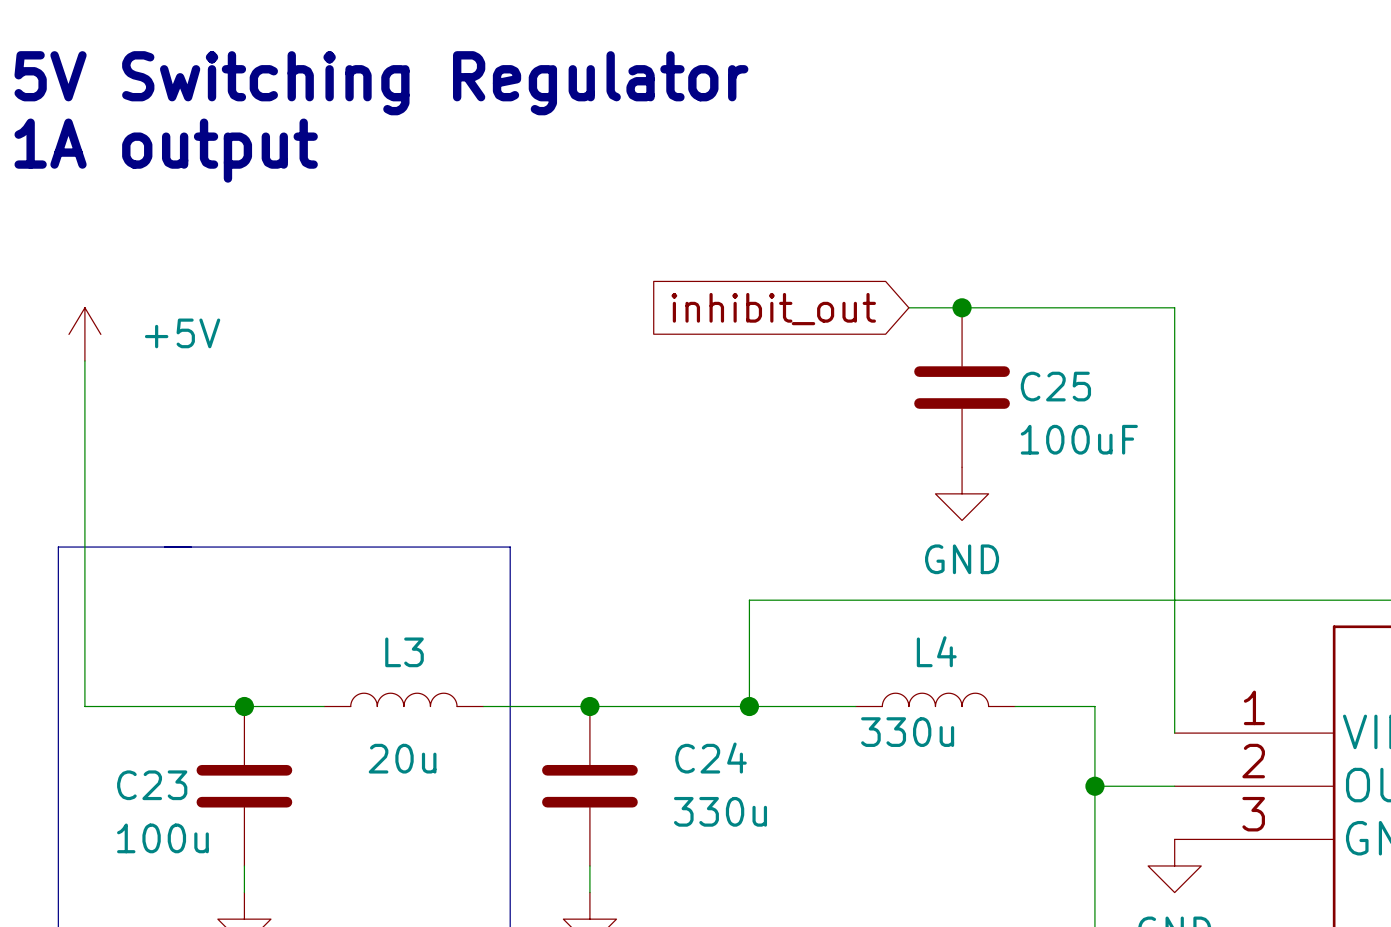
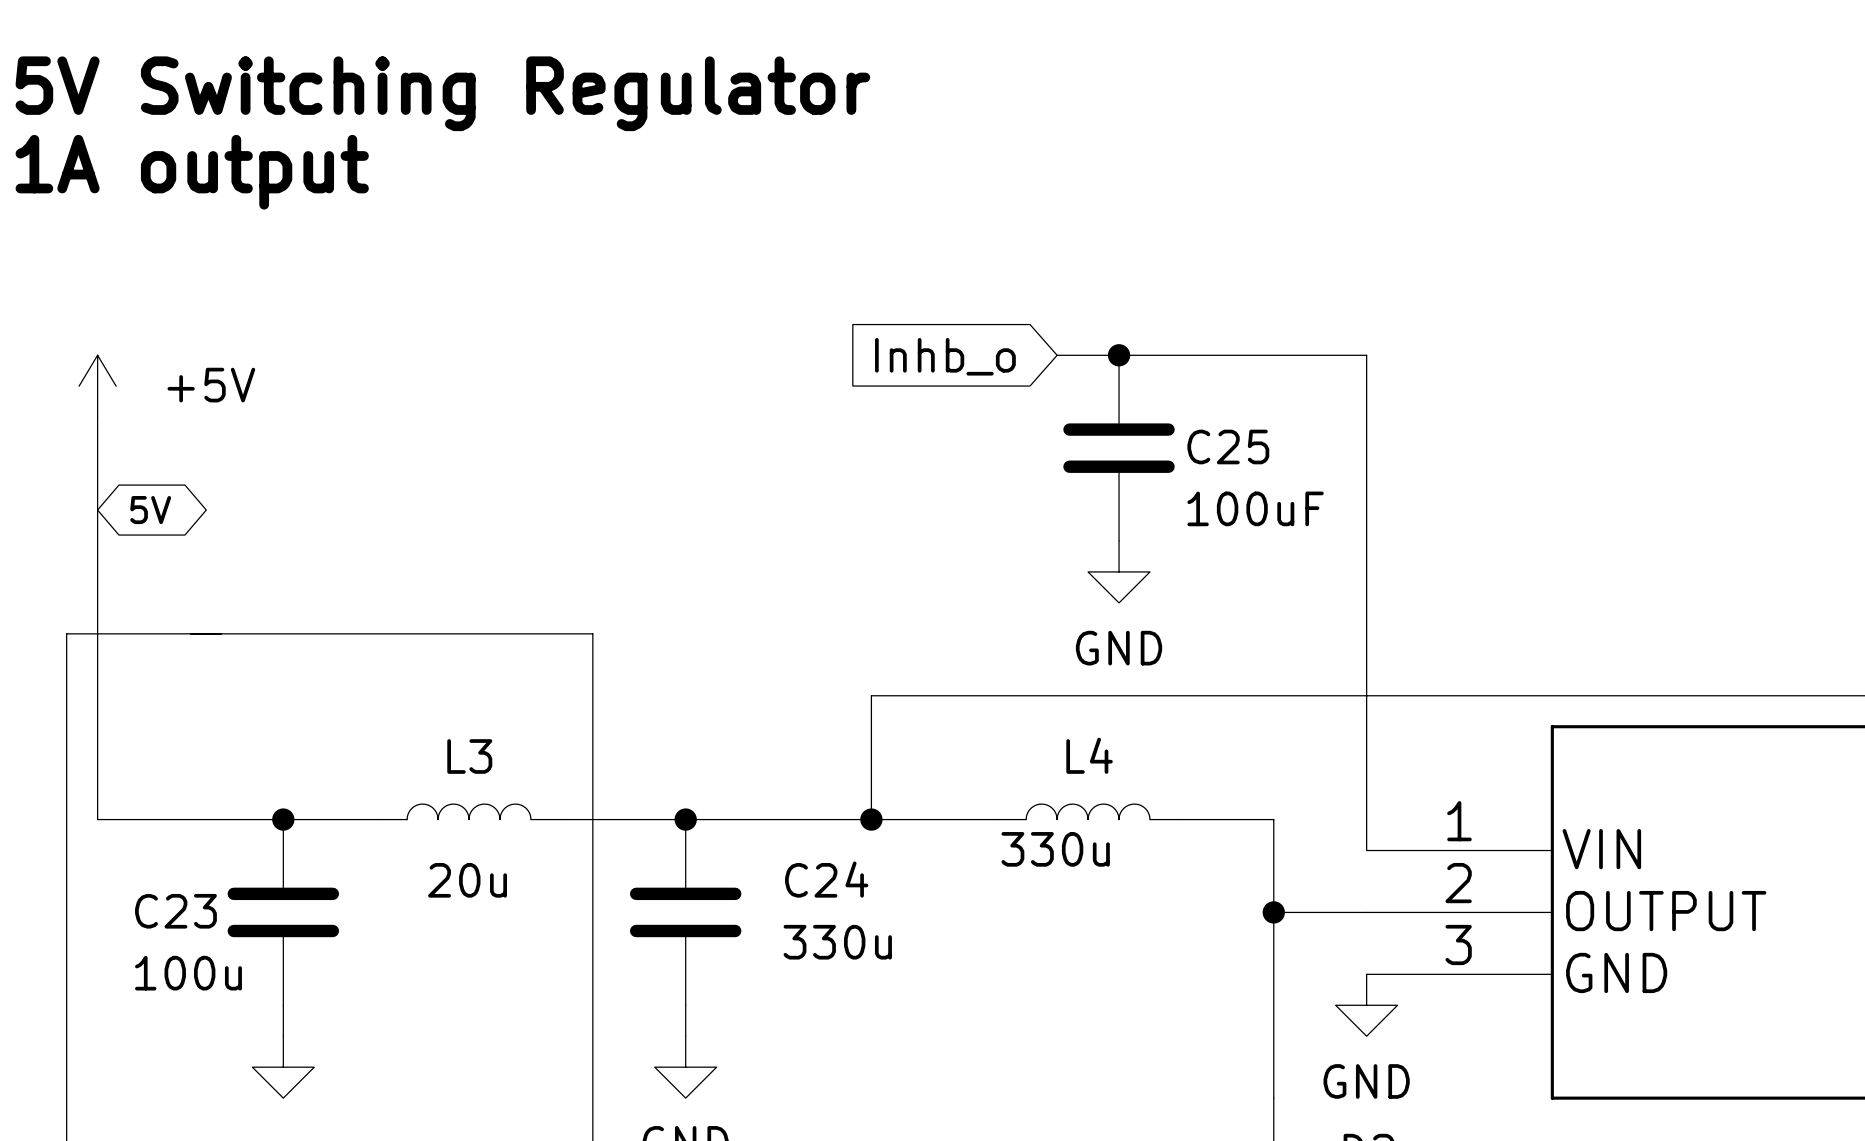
global label: inhibit_out (773, 309) -> Inhb_o (945, 356)
global label: none -> 5V (150, 510)

